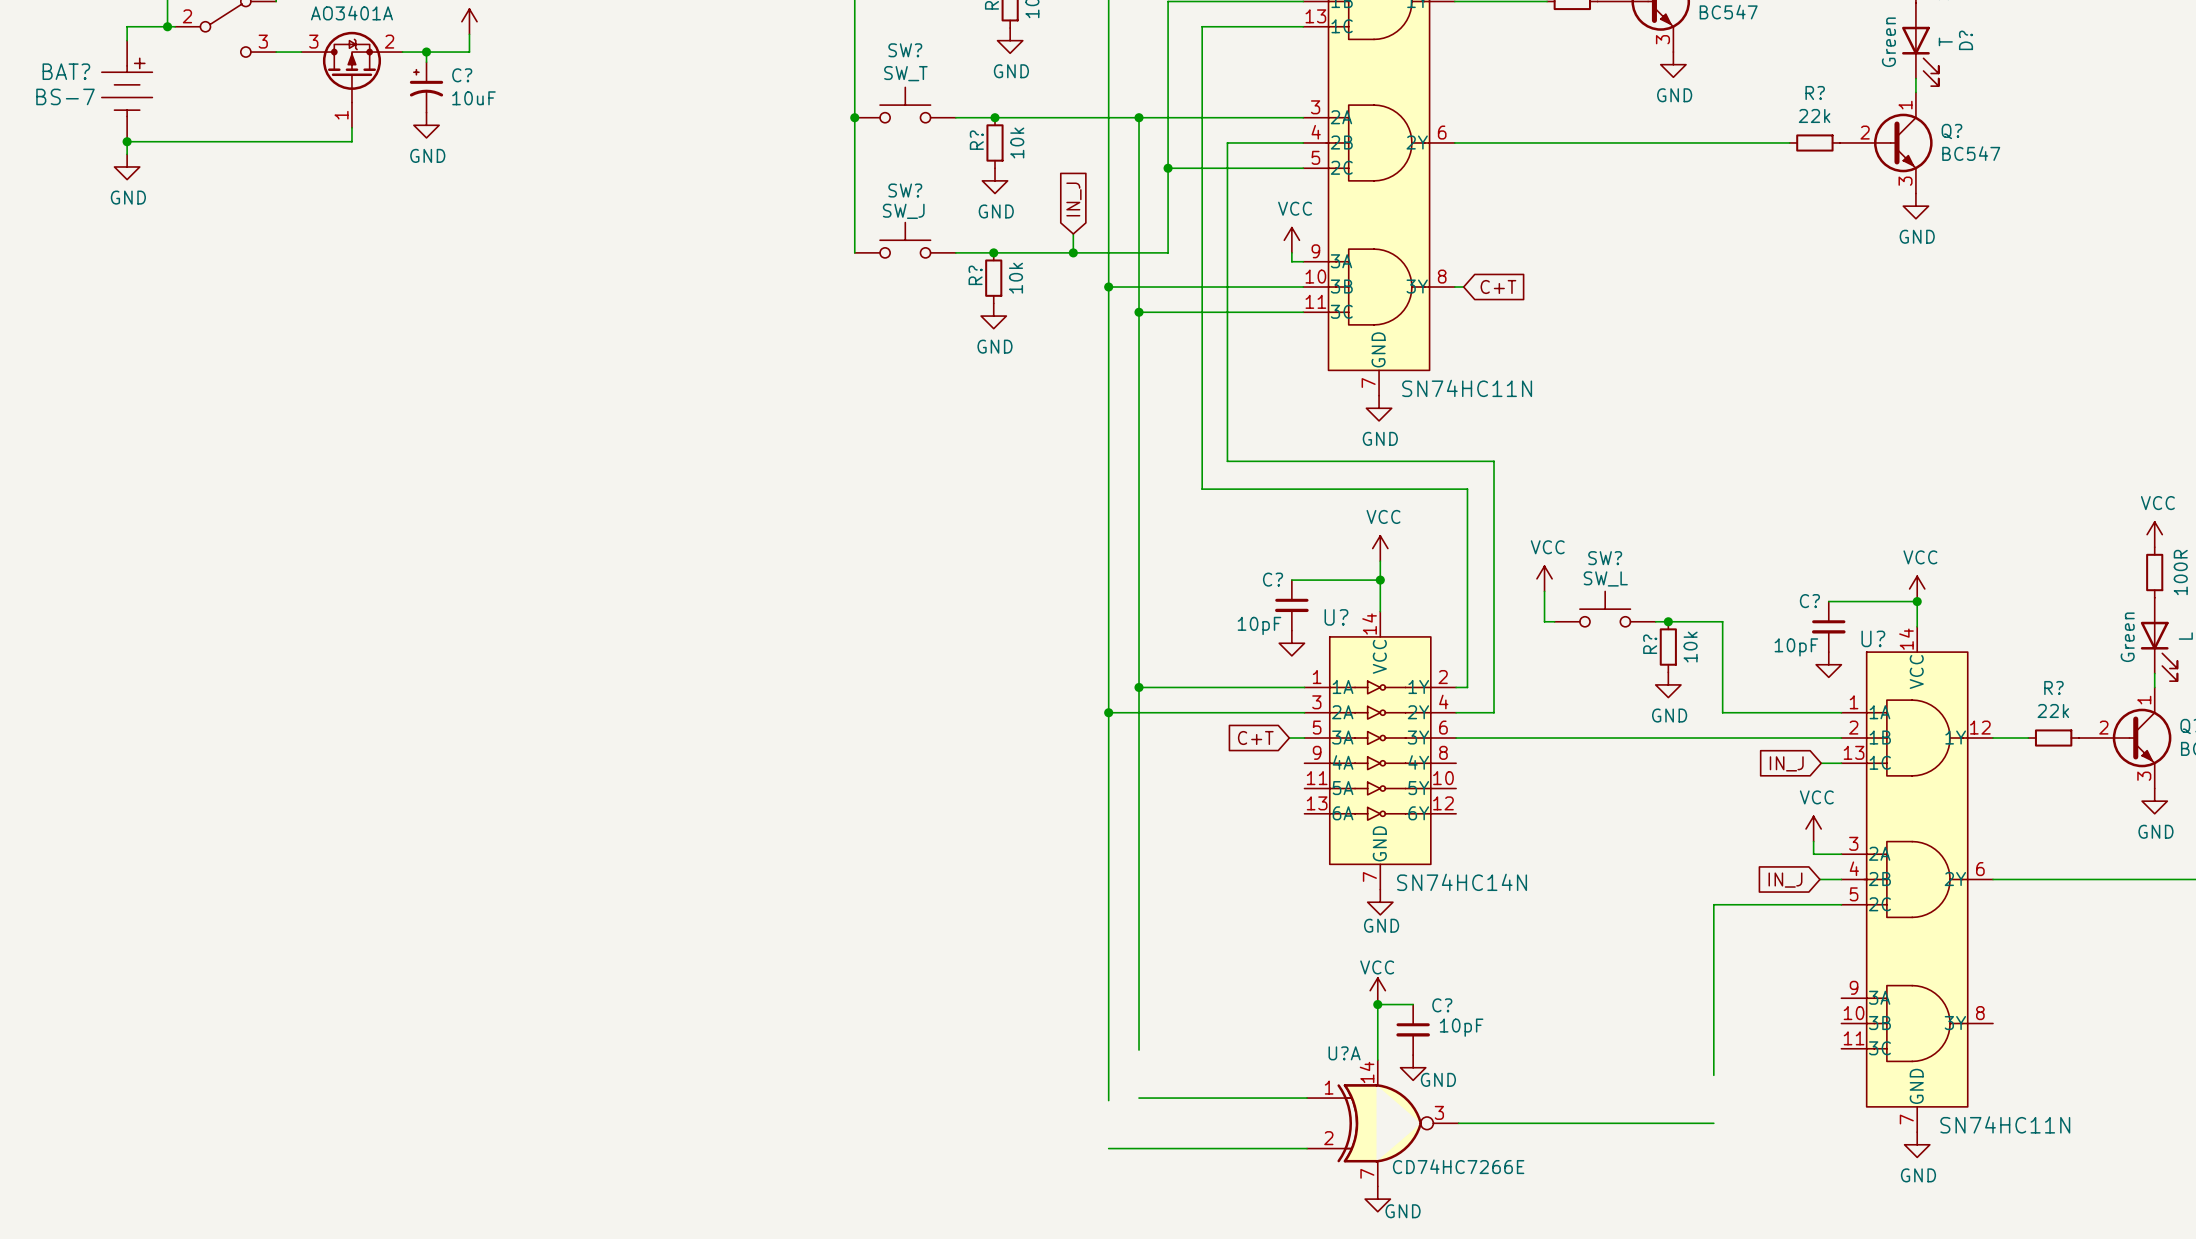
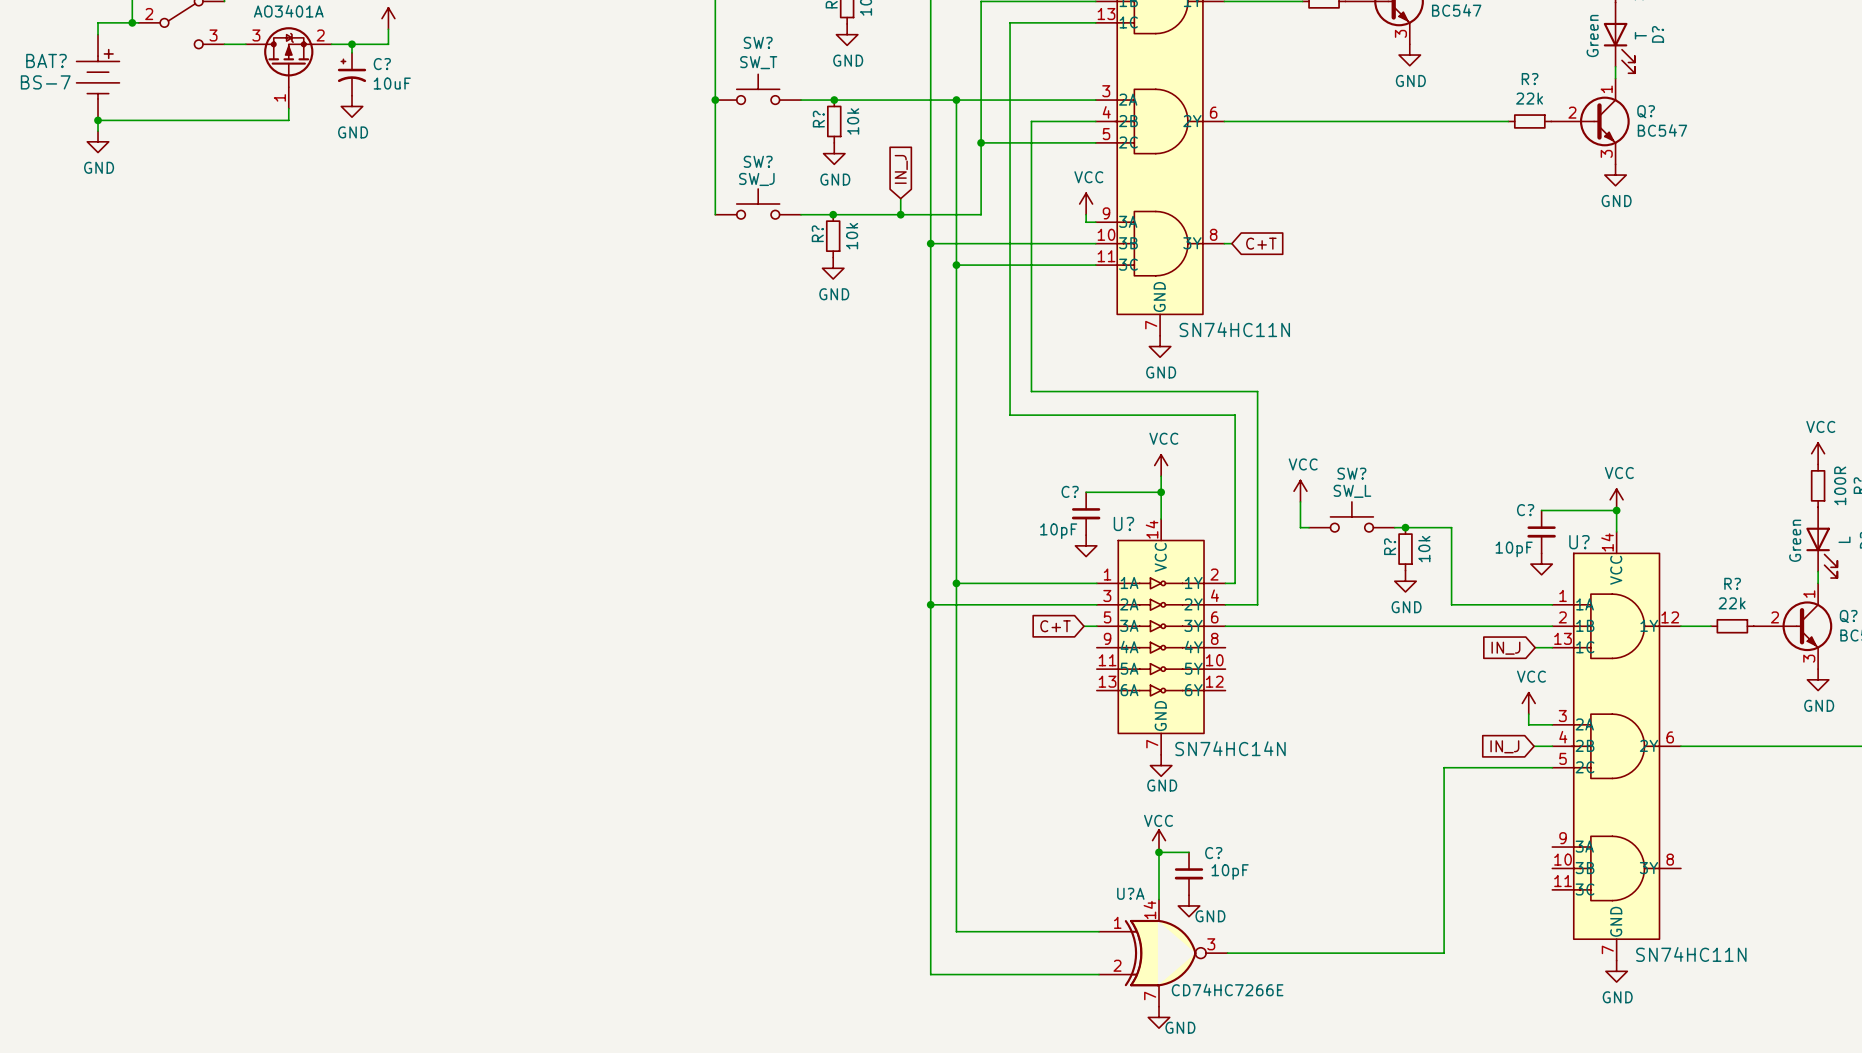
wire: none -> (956, 890) (956, 931)
wire: none -> (1444, 912) (1444, 953)
wire: none -> (930, 933) (930, 974)

